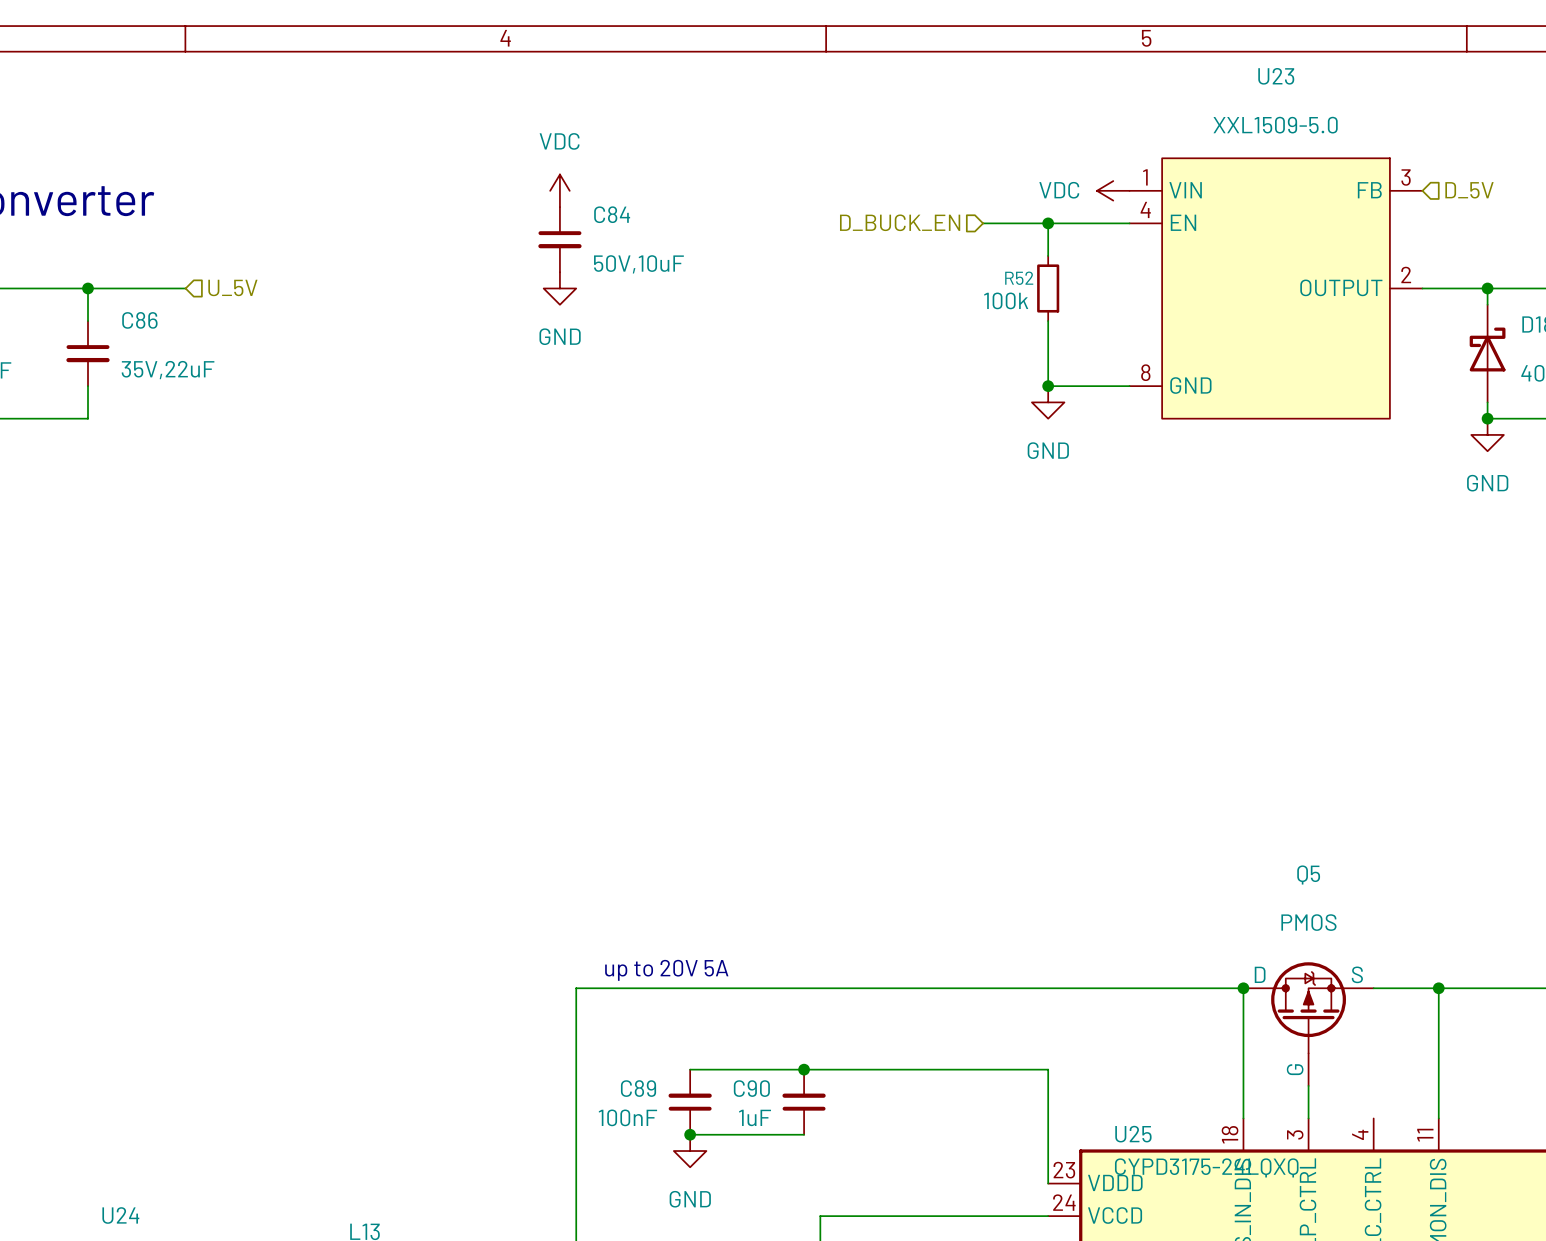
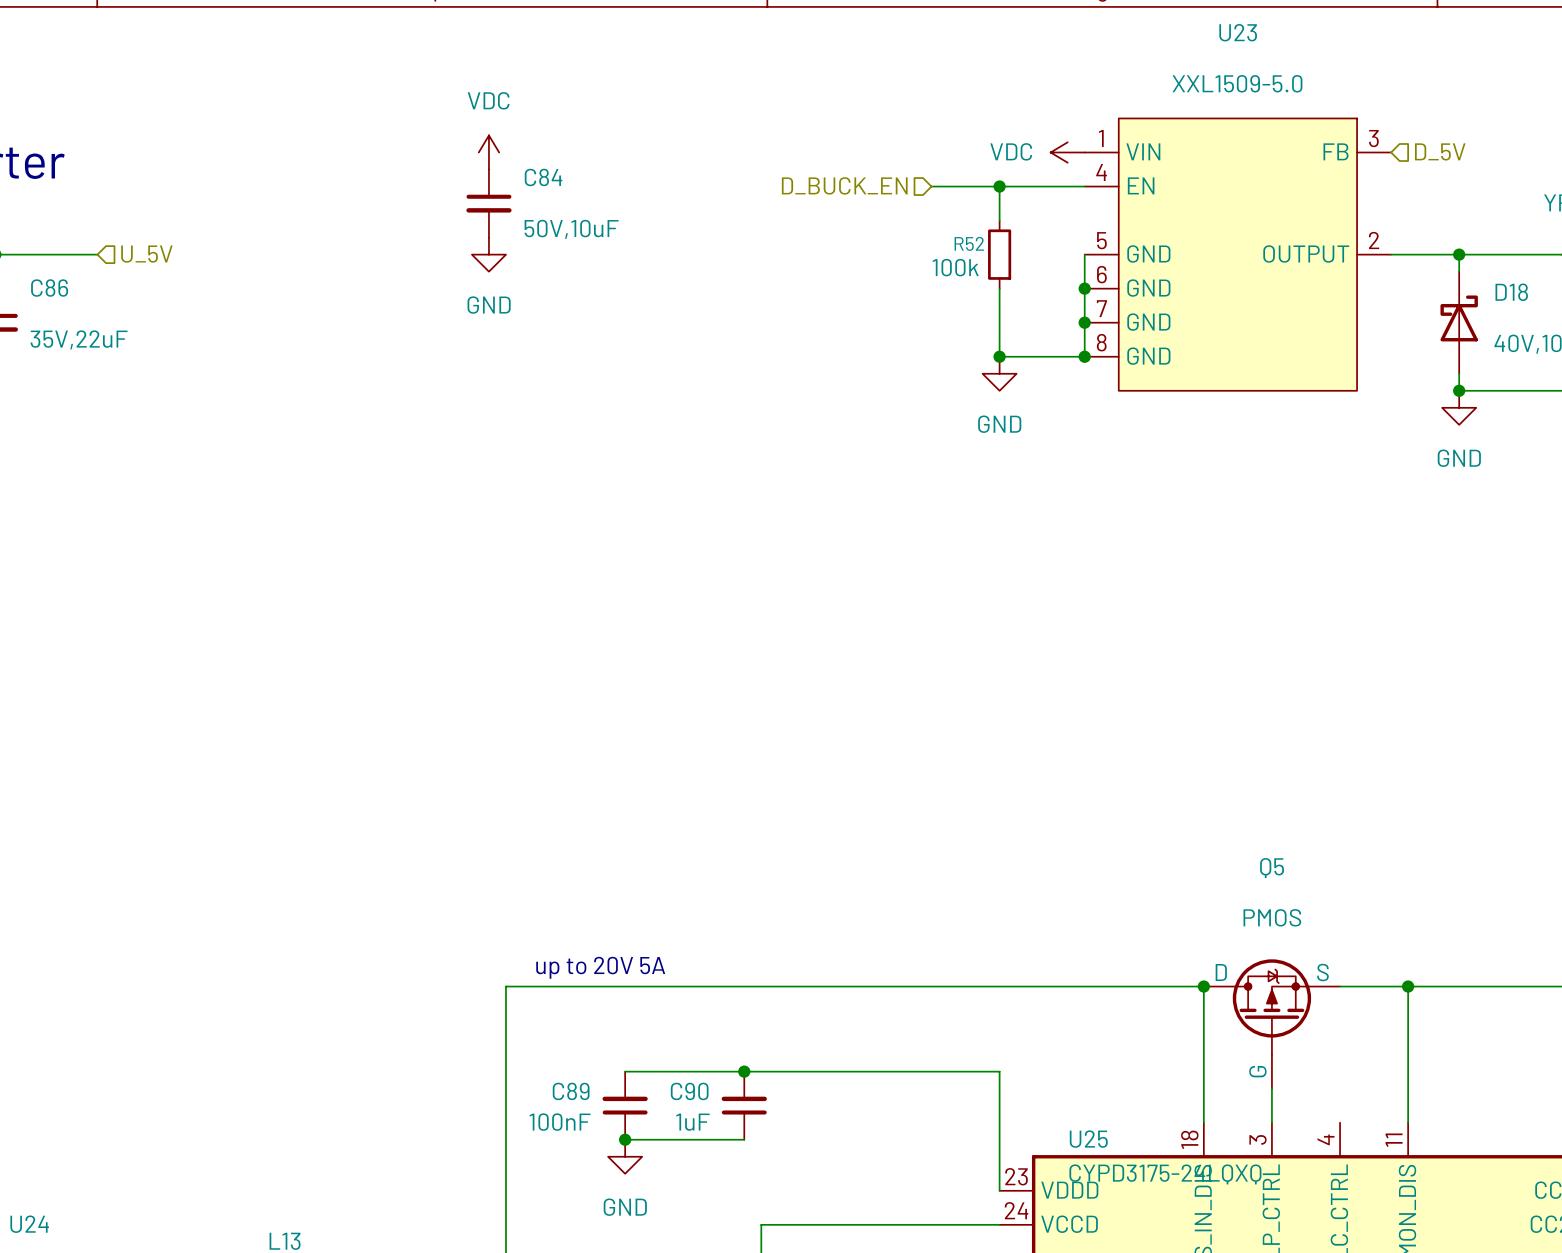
U23 symbol: [1129, 158, 1423, 419] -> [1084, 118, 1392, 391]
wire: none -> (1084, 254) (1084, 356)
junction: none -> (1084, 288)
junction: none -> (1084, 322)
junction: none -> (1084, 356)

